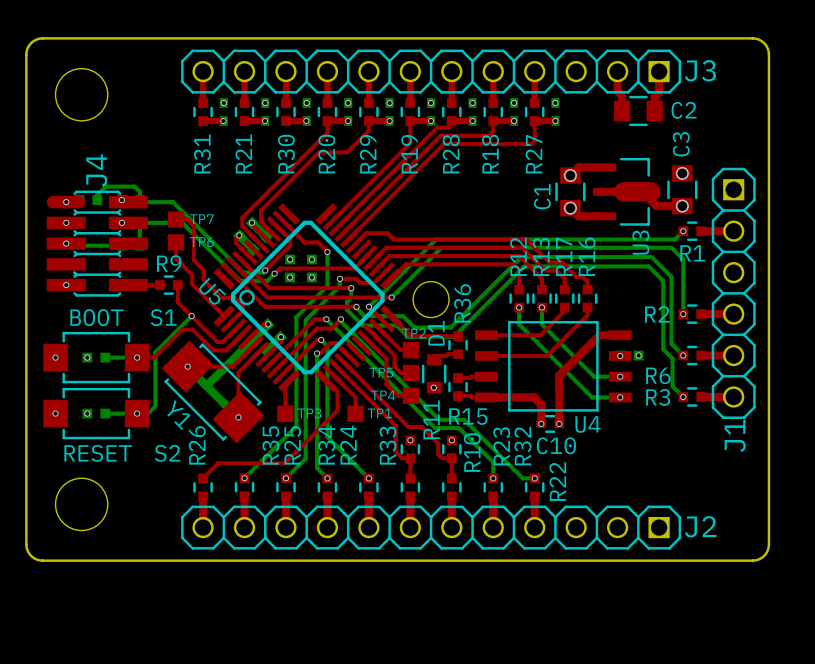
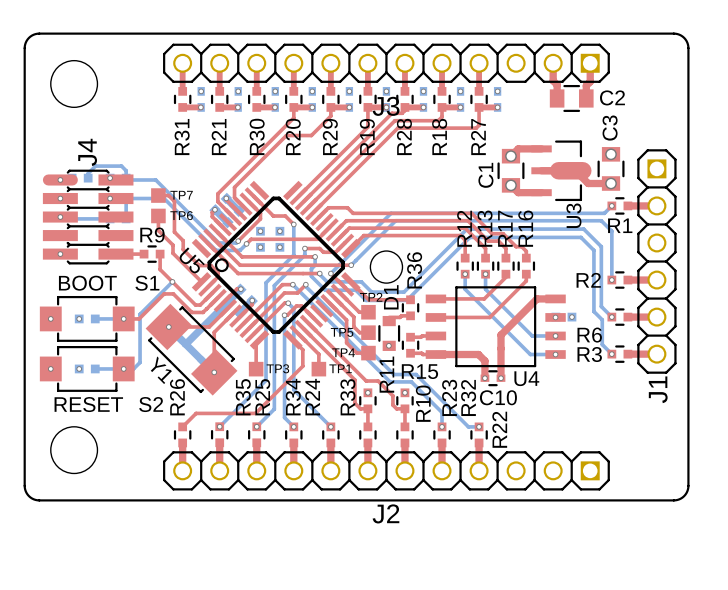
J3 name position: J3 (700, 70) -> J3 (386, 106)
J2 name position: J2 (700, 526) -> J2 (385, 513)

